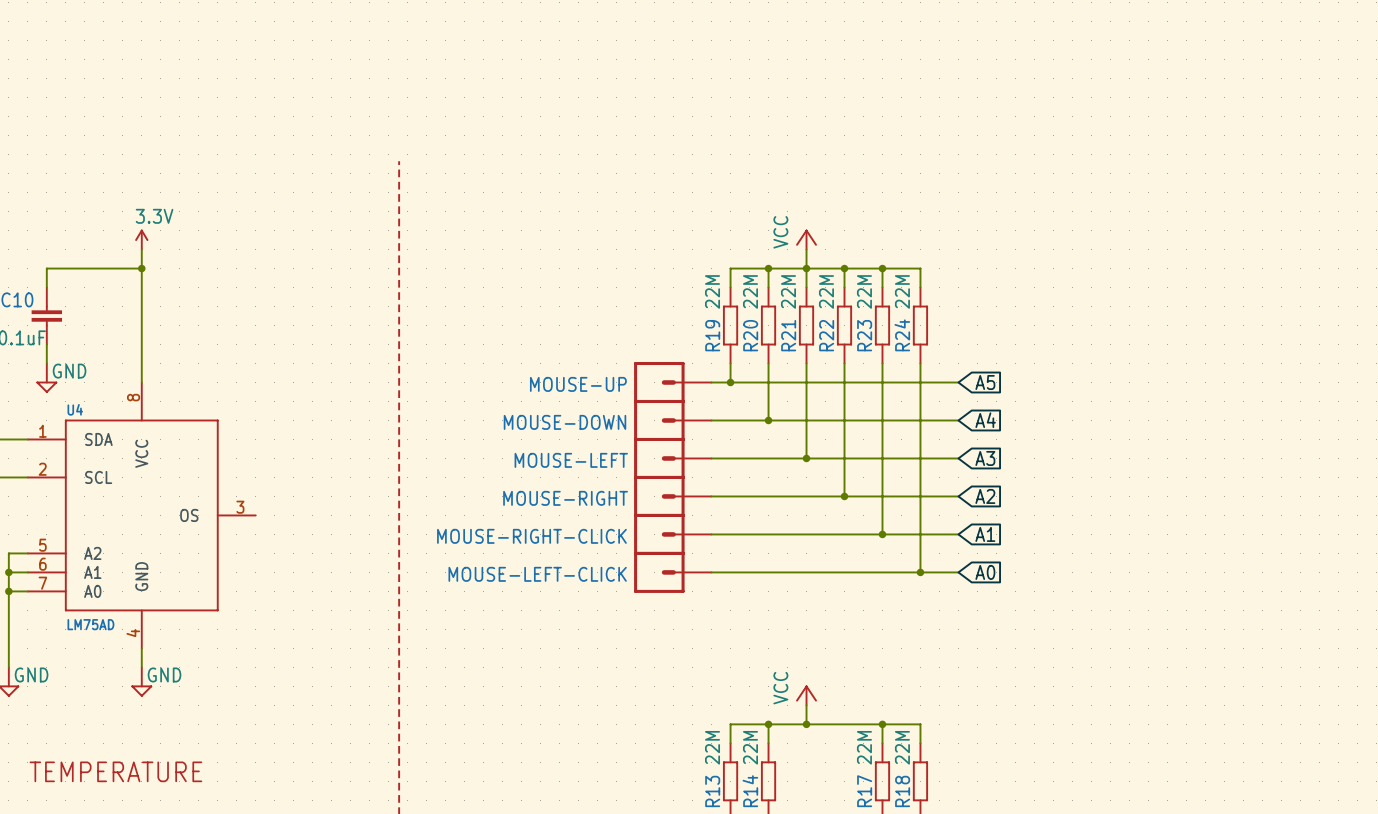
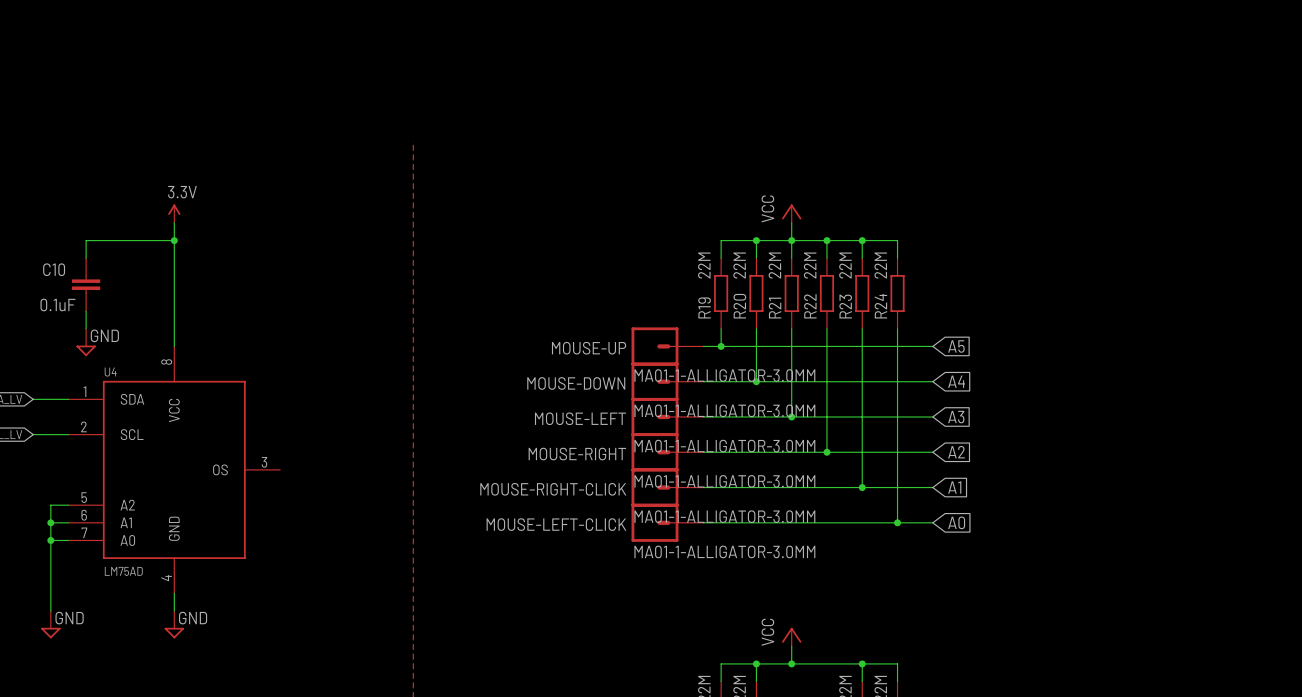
MOUSE-UP value: none -> MA01-1-ALLIGATOR-3.0MM (724, 375)
MOUSE-DOWN value: none -> MA01-1-ALLIGATOR-3.0MM (724, 410)
MOUSE-LEFT value: none -> MA01-1-ALLIGATOR-3.0MM (724, 446)
MOUSE-RIGHT value: none -> MA01-1-ALLIGATOR-3.0MM (724, 481)
MOUSE-RIGHT-CLICK value: none -> MA01-1-ALLIGATOR-3.0MM (724, 516)
MOUSE-LEFT-CLICK value: none -> MA01-1-ALLIGATOR-3.0MM (724, 551)

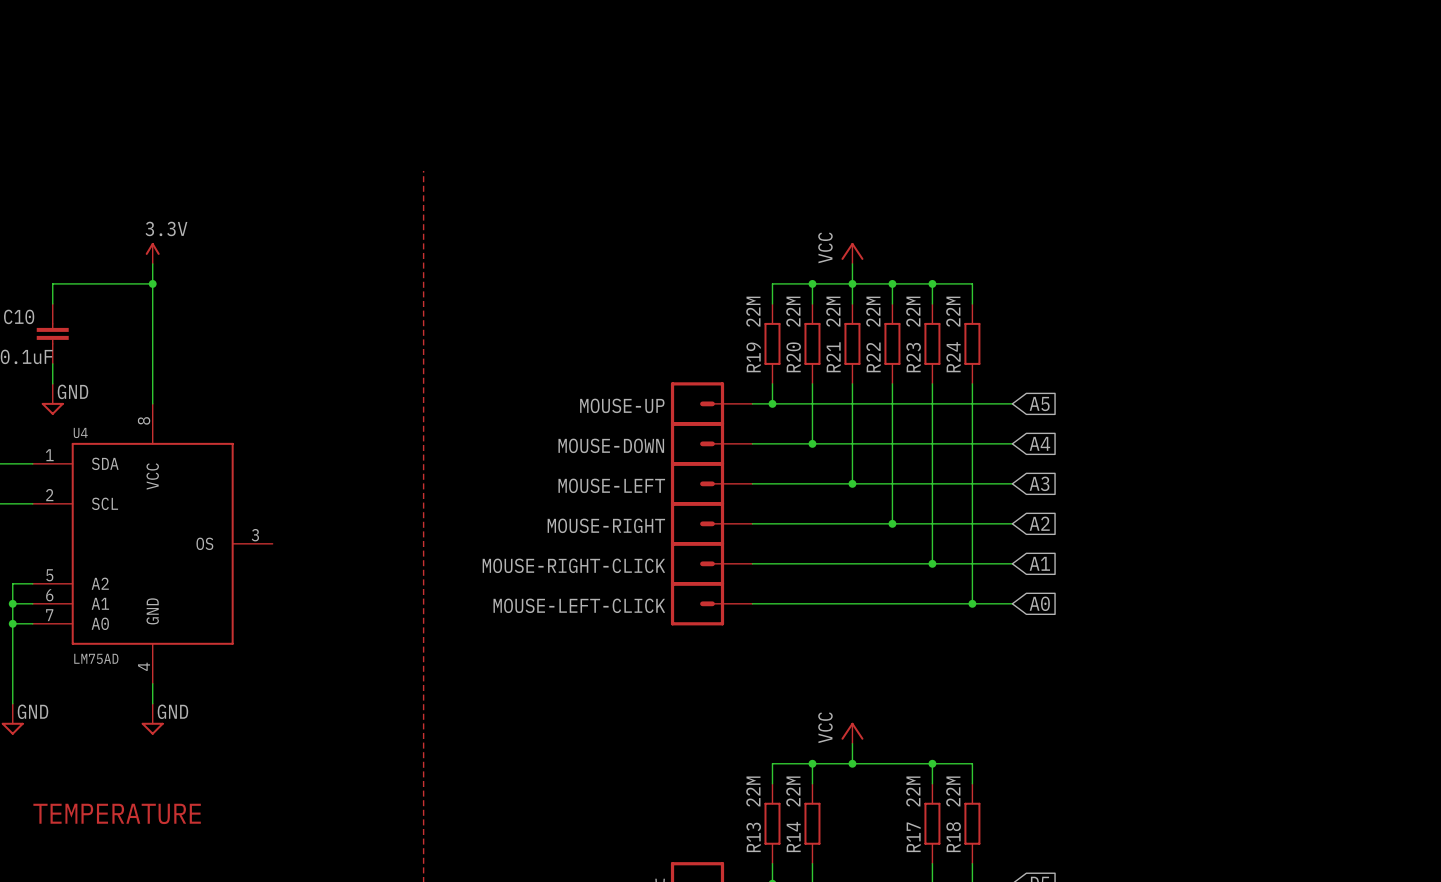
MOUSE-UP value: MA01-1-ALLIGATOR-3.0MM (724, 375) -> none
MOUSE-DOWN value: MA01-1-ALLIGATOR-3.0MM (724, 410) -> none
MOUSE-LEFT value: MA01-1-ALLIGATOR-3.0MM (724, 446) -> none
MOUSE-RIGHT value: MA01-1-ALLIGATOR-3.0MM (724, 481) -> none
MOUSE-RIGHT-CLICK value: MA01-1-ALLIGATOR-3.0MM (724, 516) -> none
MOUSE-LEFT-CLICK value: MA01-1-ALLIGATOR-3.0MM (724, 551) -> none

